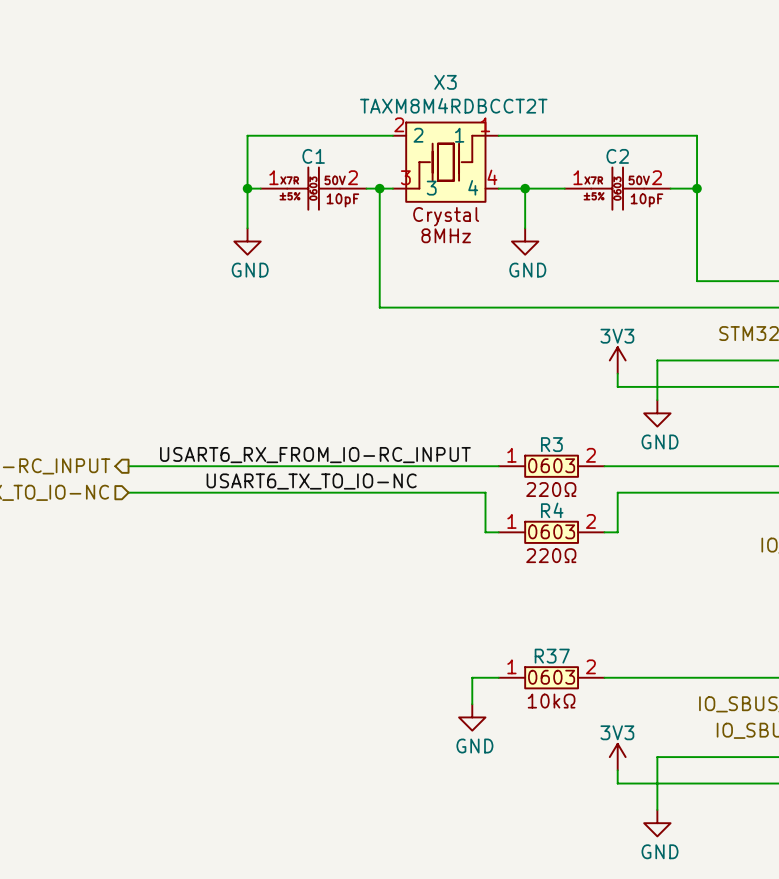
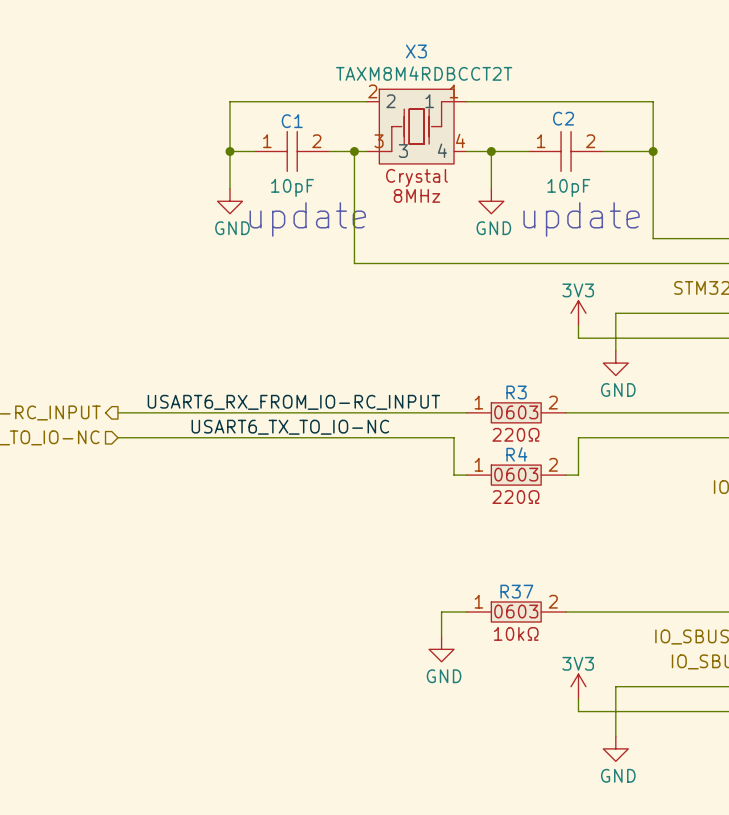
C1 symbol: [260, 167, 367, 210] -> [254, 131, 330, 172]
C2 symbol: [564, 167, 671, 210] -> [528, 131, 604, 172]
C1 text: none -> 10pF (292, 187)
C2 text: none -> 10pF (568, 187)
text: none -> update (307, 219)
text: none -> update (581, 219)

